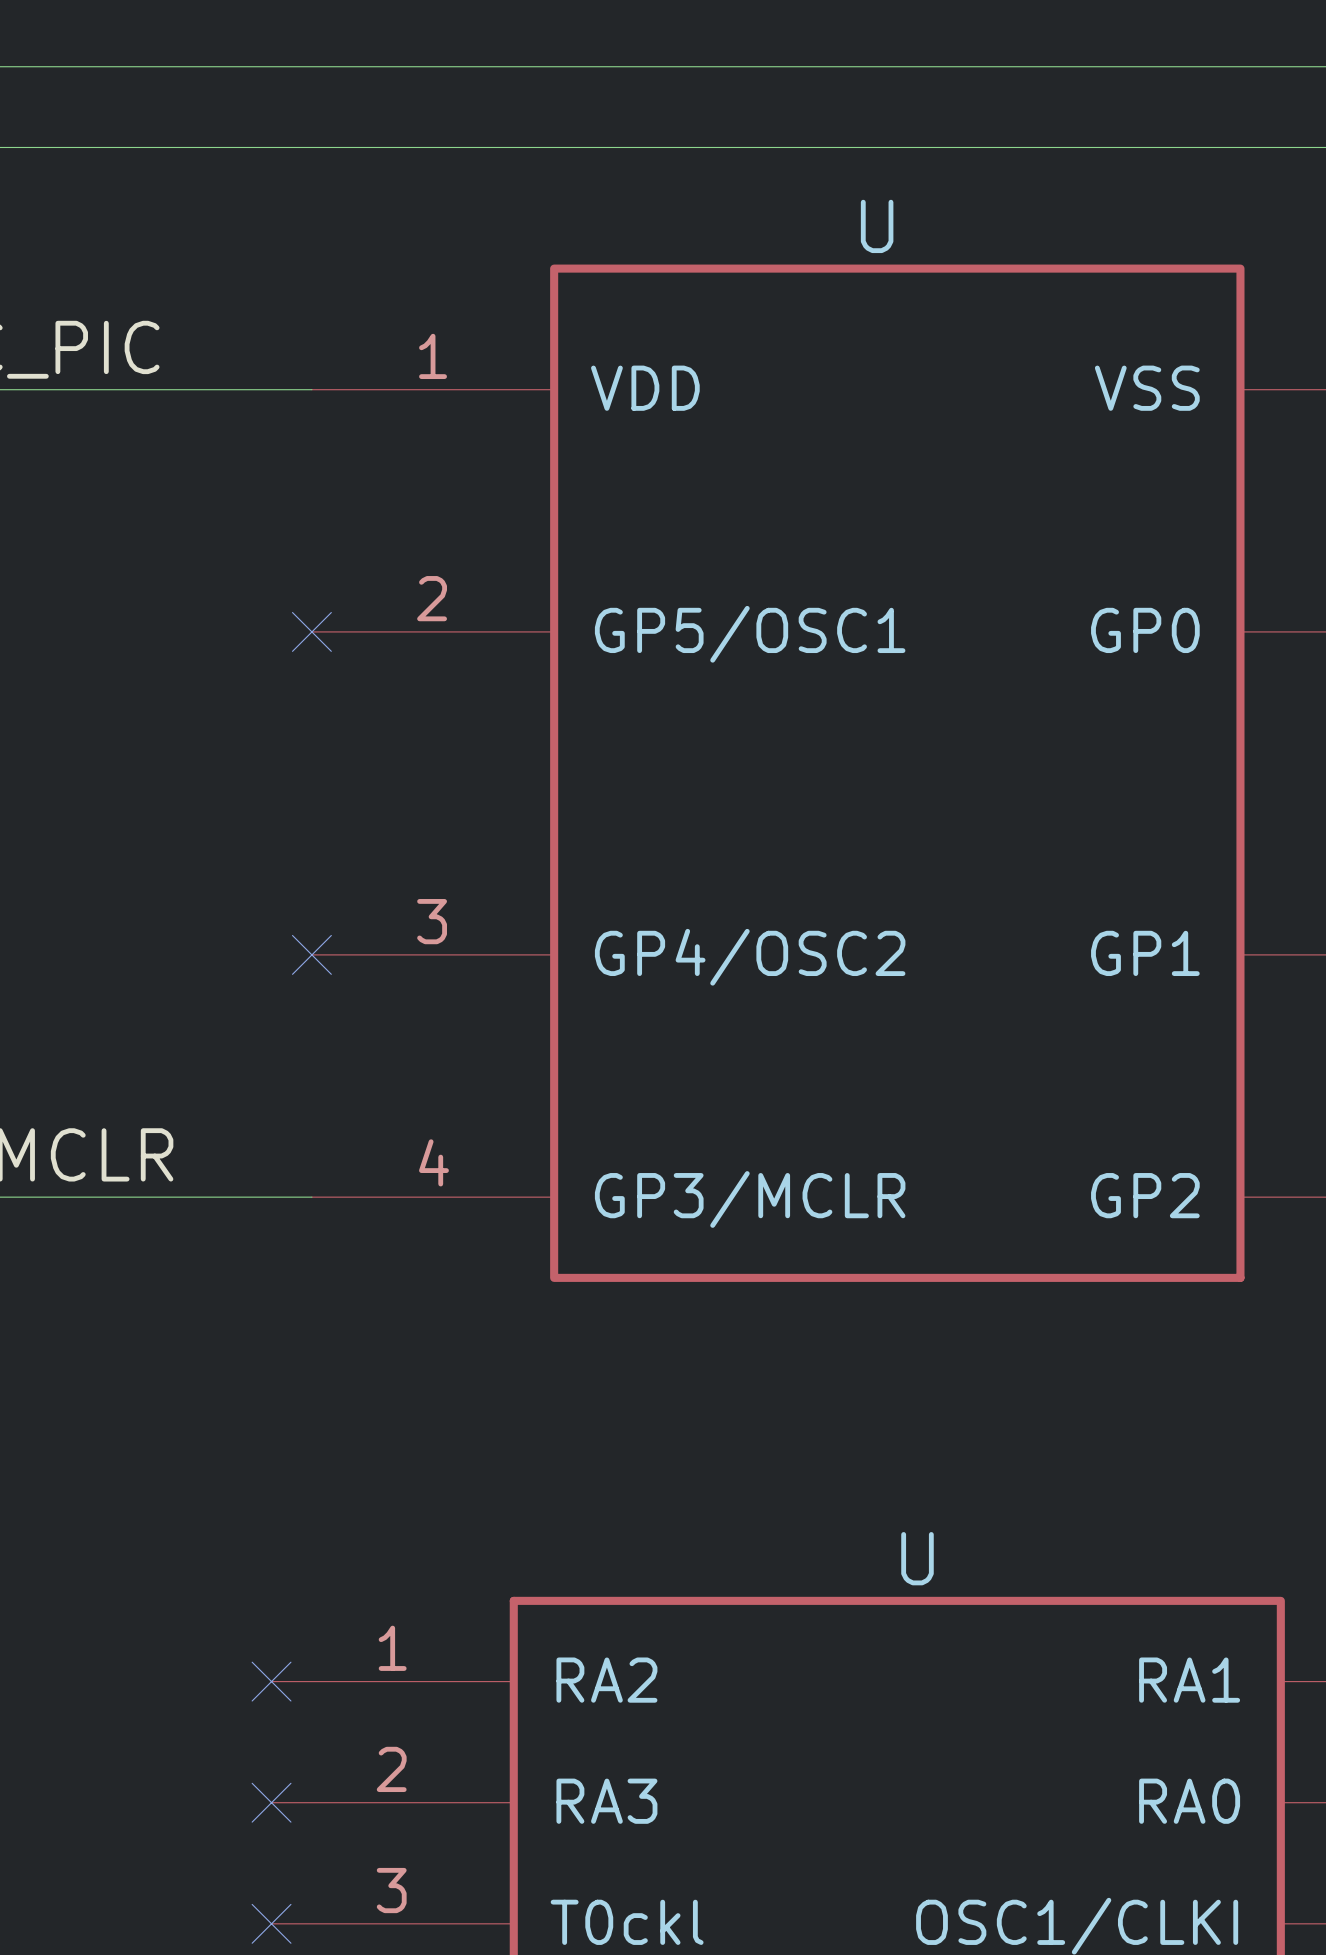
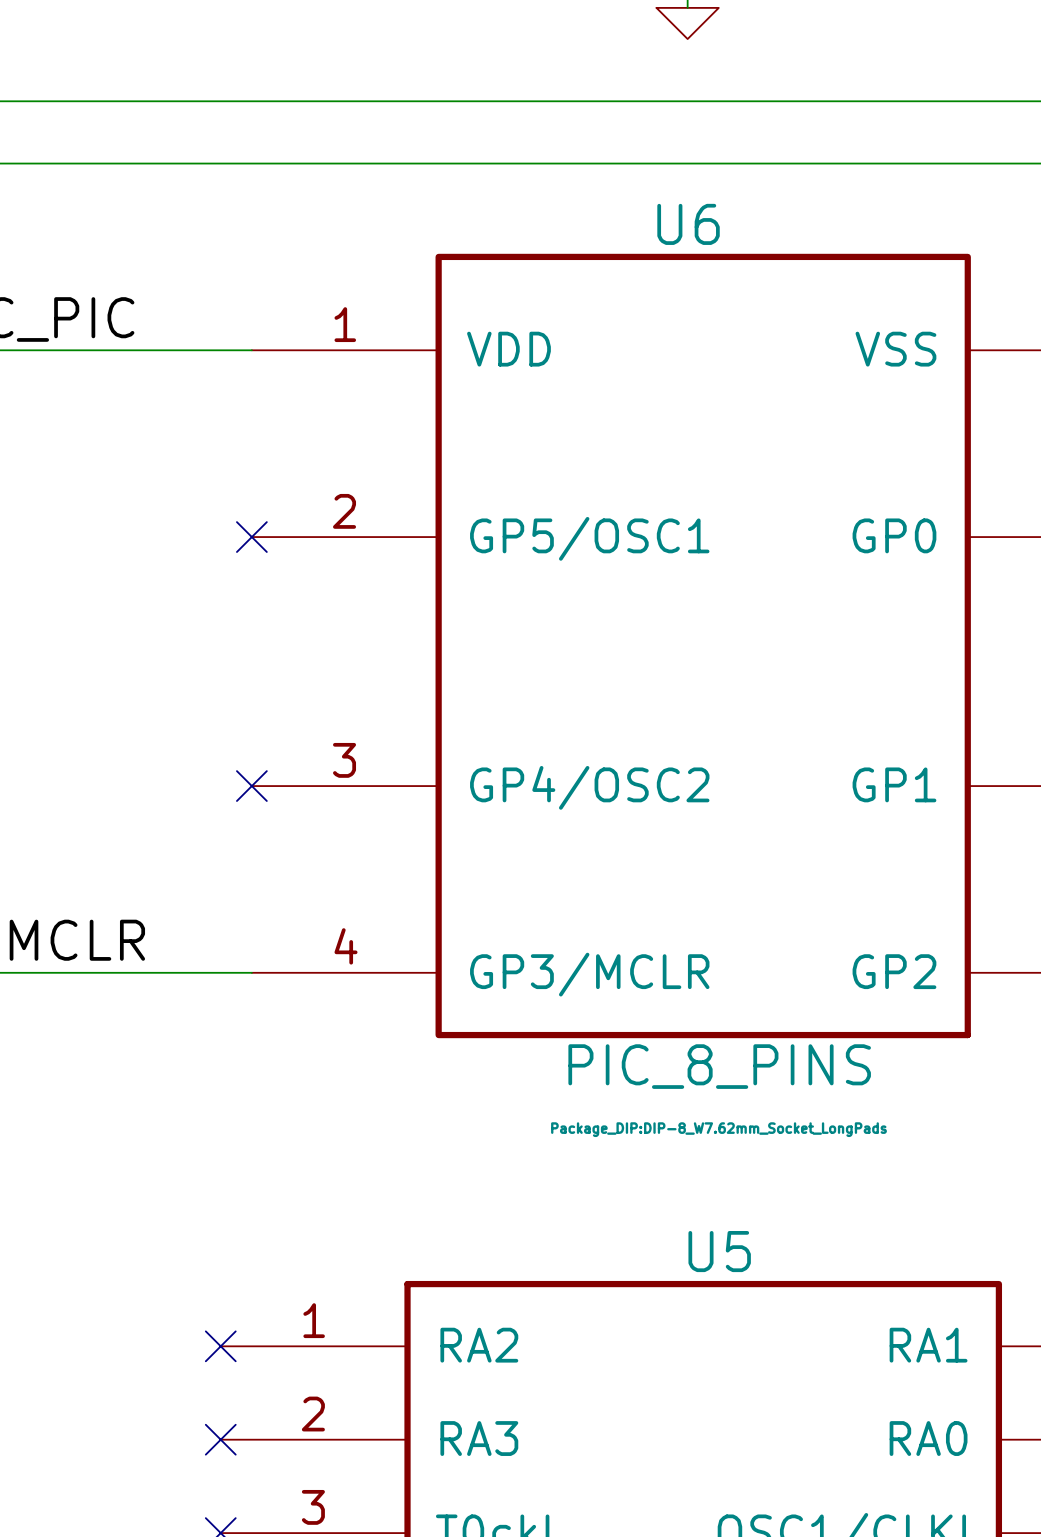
U name: U (877, 226) -> U6 (688, 224)
U value: none -> PIC_8_PINS (719, 1066)
U text: none -> Package_DIP:DIP-8_W7.62mm_Socket_LongPads (718, 1129)
U name: U (917, 1558) -> U5 (719, 1251)

